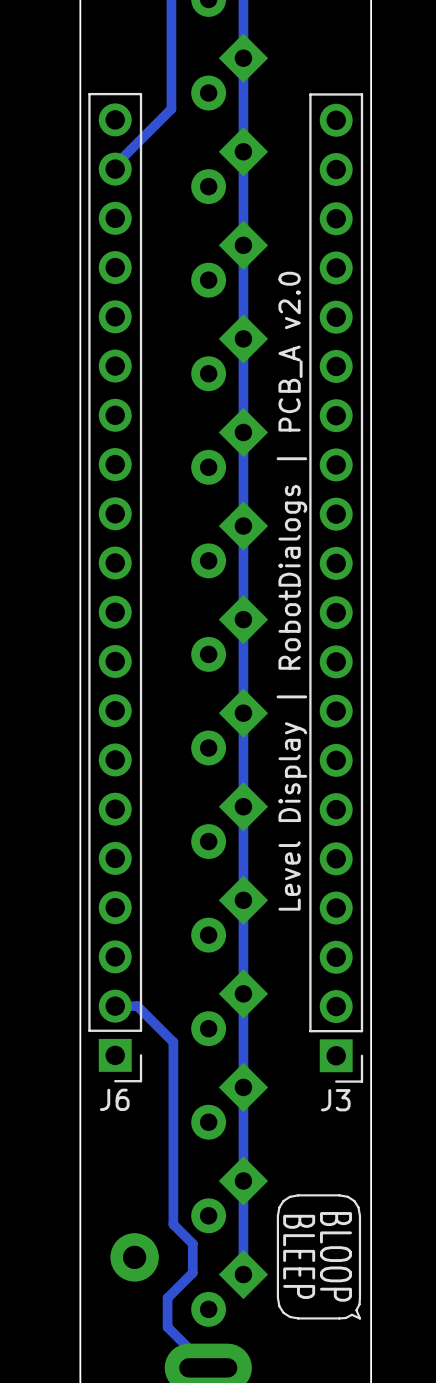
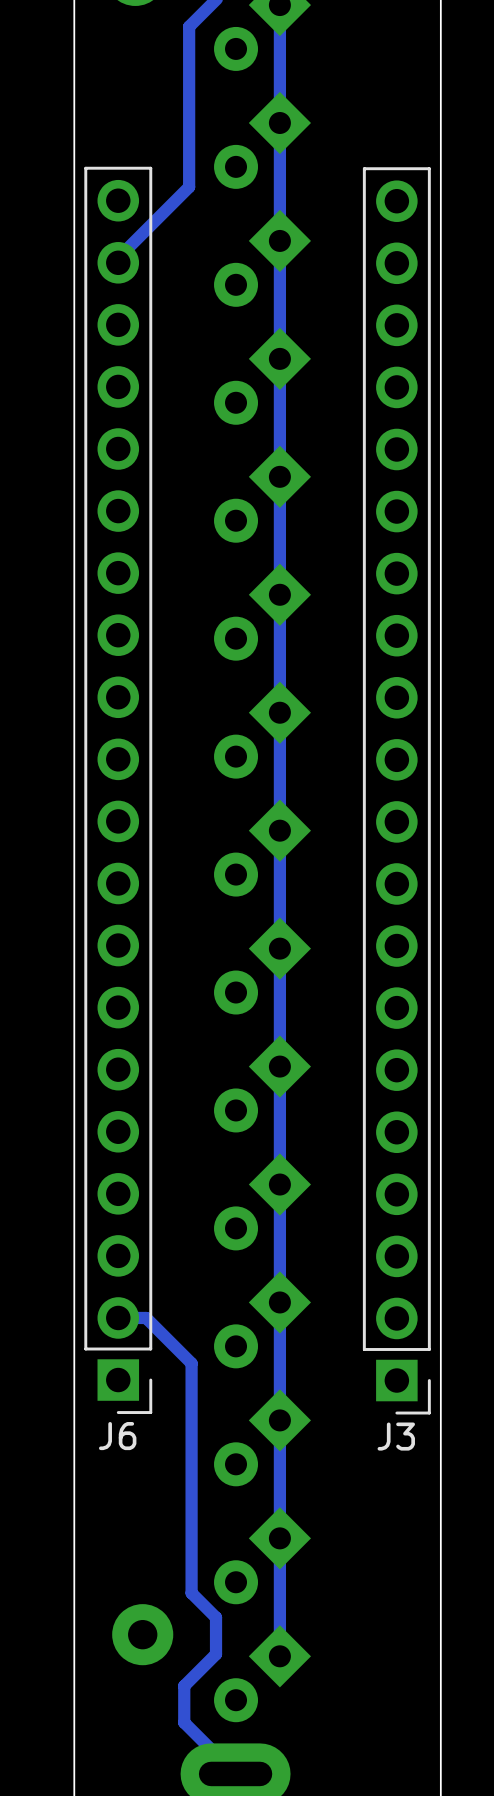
text: Level Display | RobotDialogs | PCB_A v2.0 (291, 591) -> none
drawing: [276, 1194, 362, 1320] -> none

